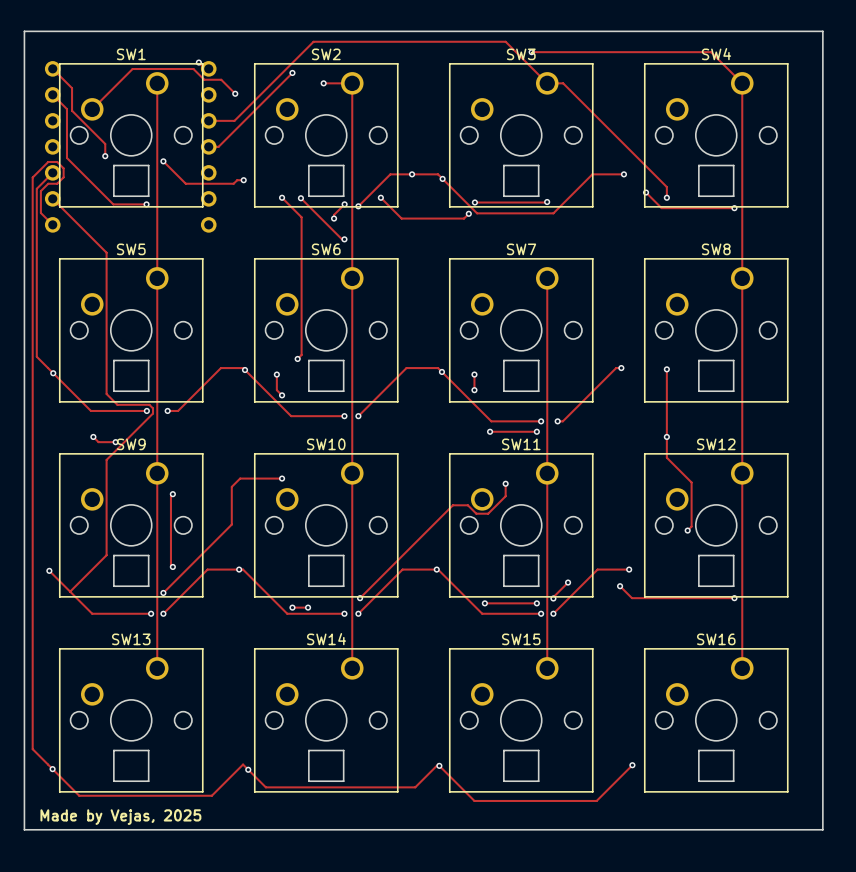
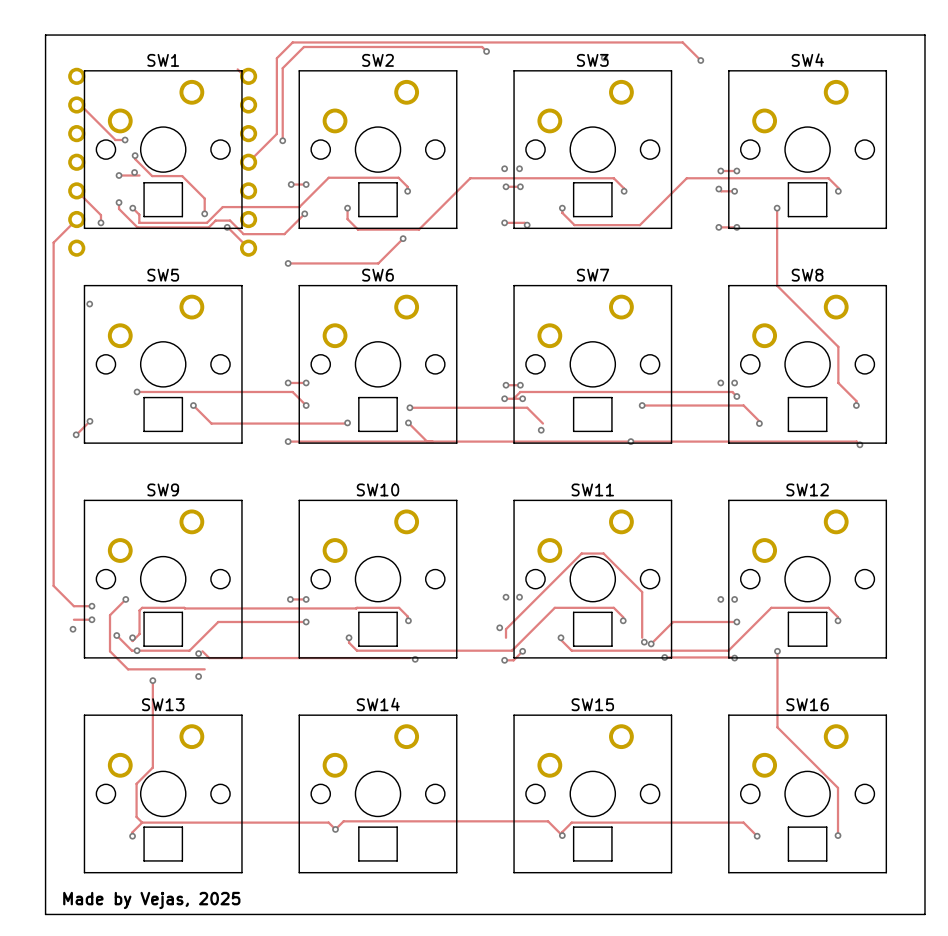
track: none -> (486, 51) (482, 46) (303, 46) (282, 68) (282, 140)
via: none -> (486, 51)
track: (531, 52) (711, 52) (742, 83) (742, 668) -> none
via: none -> (700, 60)
via: (198, 62) -> none
track: (52, 68) (72, 88) (72, 110) -> (76, 104) (80, 104) (98, 122)
track: (292, 72) (218, 146) (208, 146) -> (700, 60) (682, 42) (292, 42) (276, 58) (276, 133) (248, 162)
via: (292, 72) -> none
track: (157, 83) (157, 668) -> none
track: (323, 83) (352, 83) (352, 668) -> none
via: (323, 83) -> none
track: (235, 93) (221, 79) (204, 79) (193, 69) (132, 69) (92, 109) -> none
via: (235, 93) -> none
track: (52, 94) (66, 109) (66, 158) (113, 204) (146, 204) -> none
track: (208, 120) (234, 120) (313, 41) (505, 41) (547, 83) (563, 83) (666, 187) (666, 197) -> none
track: (87, 126) (105, 143) (105, 156) -> (115, 140) (125, 140)
via: none -> (125, 140)
via: none -> (282, 140)
track: none -> (135, 155) (135, 159) (152, 176) (182, 176) (204, 198) (204, 213)
via: none -> (135, 155)
via: none -> (504, 168)
via: none -> (519, 168)
track: none -> (720, 171) (736, 171)
via: none -> (720, 171)
via: none -> (736, 171)
track: none -> (119, 175) (139, 175)
via: none -> (119, 175)
track: (163, 161) (185, 183) (233, 183) (237, 180) (243, 180) -> none
via: (163, 161) -> none
track: none -> (291, 184) (306, 184)
via: none -> (291, 184)
via: none -> (306, 184)
track: none -> (506, 186) (520, 186)
via: none -> (506, 186)
via: none -> (520, 186)
track: none -> (718, 189) (721, 191) (734, 191)
via: none -> (718, 189)
track: (52, 172) (36, 188) (36, 356) (90, 410) (146, 410) -> (76, 190) (100, 215) (100, 222)
track: none -> (407, 191) (407, 186) (398, 177) (328, 177) (299, 207) (222, 207) (206, 222) (139, 222) (139, 214) (132, 208)
via: none -> (407, 191)
track: none -> (624, 191) (624, 188) (613, 178) (470, 178) (418, 229) (358, 229) (347, 219) (347, 208)
via: none -> (624, 191)
via: none -> (734, 191)
track: none -> (838, 191) (838, 188) (828, 178) (686, 178) (639, 225) (574, 225) (562, 212) (562, 208)
via: none -> (838, 191)
via: (412, 174) -> none
track: (623, 174) (592, 174) (553, 213) (477, 213) (438, 174) (390, 174) (358, 206) -> none
via: (623, 174) -> none
via: (442, 178) -> none
via: (243, 180) -> none
track: none -> (119, 202) (119, 208) (137, 227) (208, 227) (215, 220) (230, 220) (243, 234) (284, 234) (304, 213)
via: none -> (119, 202)
via: none -> (132, 208)
via: none -> (347, 208)
via: none -> (562, 208)
track: none -> (777, 208) (777, 285) (838, 346) (838, 382) (856, 401) (856, 405)
via: none -> (777, 208)
track: (646, 192) (661, 208) (734, 208) -> none
via: (646, 192) -> none
via: none -> (204, 213)
via: none -> (304, 213)
track: (282, 197) (301, 217) (301, 355) (297, 358) -> none
via: (282, 197) -> none
track: (380, 197) (401, 218) (464, 218) (468, 213) -> none
via: (380, 197) -> none
via: (666, 197) -> none
track: (52, 198) (106, 252) (106, 394) (117, 404) (149, 404) (153, 408) (153, 413) (106, 459) (106, 555) (70, 591) -> (76, 219) (53, 242) (53, 585) (73, 606) (91, 606)
track: (300, 198) (342, 239) (344, 239) -> none
via: (300, 198) -> none
via: none -> (100, 222)
track: none -> (504, 222) (524, 222) (527, 225)
via: none -> (504, 222)
via: (474, 202) -> none
track: (547, 202) (474, 202) -> none
via: (547, 202) -> none
via: none -> (527, 225)
via: (146, 204) -> none
track: (344, 204) (334, 214) (334, 218) -> none
via: (344, 204) -> none
track: none -> (227, 227) (248, 248)
via: none -> (227, 227)
track: none -> (718, 227) (736, 227)
via: none -> (718, 227)
via: none -> (736, 227)
via: (358, 206) -> none
via: (734, 208) -> none
via: (468, 213) -> none
track: none -> (403, 238) (378, 263) (288, 263)
via: none -> (403, 238)
via: (334, 218) -> none
track: (52, 224) (40, 213) (40, 191) (48, 183) (57, 183) (63, 177) (63, 168) (57, 161) (48, 161) (32, 177) (32, 749) (79, 795) (211, 795) (243, 764) (265, 787) (415, 787) (438, 764) (474, 800) (596, 800) (632, 765) -> none
via: none -> (288, 263)
via: (344, 239) -> none
via: none -> (89, 304)
track: (547, 278) (547, 668) -> none
track: none -> (288, 382) (306, 382)
via: none -> (288, 382)
via: none -> (306, 382)
via: none -> (720, 382)
via: none -> (734, 382)
track: none -> (506, 385) (520, 385)
via: none -> (506, 385)
via: none -> (520, 385)
track: none -> (137, 391) (292, 391) (306, 405)
via: none -> (137, 391)
via: (297, 358) -> none
track: none -> (736, 396) (732, 391) (520, 391) (513, 398)
via: none -> (736, 396)
track: none -> (504, 398) (522, 398)
via: none -> (504, 398)
via: none -> (522, 398)
track: none -> (193, 405) (211, 423) (347, 422)
via: none -> (193, 405)
via: none -> (306, 405)
track: none -> (642, 405) (743, 405) (759, 423)
via: none -> (642, 405)
via: none -> (856, 405)
track: (621, 368) (616, 368) (562, 421) (557, 421) -> none
via: (621, 368) -> none
track: none -> (409, 407) (527, 407) (542, 423)
via: none -> (409, 407)
track: (666, 369) (666, 457) (691, 482) (691, 526) (687, 530) -> none
via: (666, 369) -> none
via: (245, 370) -> none
via: (441, 371) -> none
via: (53, 373) -> none
track: (276, 374) (276, 390) (282, 395) -> none
via: (276, 374) -> none
track: (474, 374) (474, 390) -> none
via: (474, 374) -> none
track: none -> (89, 421) (76, 434)
via: none -> (89, 421)
via: none -> (347, 422)
track: none -> (408, 422) (427, 441)
via: none -> (408, 422)
via: none -> (759, 423)
via: none -> (76, 434)
via: (282, 395) -> none
track: none -> (288, 441) (856, 441) (859, 444)
via: none -> (288, 441)
via: none -> (630, 441)
via: none -> (859, 444)
via: (146, 410) -> none
track: (167, 410) (178, 410) (220, 368) (243, 368) (291, 416) (344, 416) -> none
via: (167, 410) -> none
via: (344, 416) -> none
track: (358, 416) (406, 368) (438, 368) (491, 421) (541, 421) -> none
via: (358, 416) -> none
via: (541, 421) -> none
via: (557, 421) -> none
track: (490, 431) (536, 431) -> none
via: (490, 431) -> none
via: (536, 431) -> none
track: (93, 436) (98, 442) (115, 442) -> none
via: (93, 436) -> none
via: (666, 436) -> none
via: (115, 442) -> none
track: (282, 478) (240, 478) (231, 486) (231, 524) (163, 592) -> none
via: (282, 478) -> none
track: (505, 483) (505, 496) (488, 513) (476, 513) (467, 505) (452, 505) (360, 598) -> none
via: (505, 483) -> none
track: (172, 494) (170, 496) (170, 565) (172, 566) -> none
via: (172, 494) -> none
via: (687, 530) -> none
via: none -> (506, 597)
via: none -> (519, 597)
track: none -> (125, 599) (110, 615) (110, 651) (128, 669) (204, 669)
via: none -> (125, 599)
track: none -> (290, 599) (306, 599)
via: none -> (290, 599)
via: none -> (306, 599)
via: none -> (720, 599)
via: none -> (734, 599)
via: none -> (91, 606)
track: none -> (73, 619) (91, 619)
via: none -> (91, 619)
track: none -> (408, 620) (407, 616) (399, 607) (142, 607) (139, 610) (139, 634) (132, 641) (132, 637)
via: none -> (408, 620)
track: none -> (623, 620) (623, 617) (613, 607) (554, 607) (511, 650) (356, 650) (349, 642) (349, 637)
via: none -> (623, 620)
track: none -> (838, 620) (838, 617) (828, 607) (771, 607) (728, 650) (571, 650) (560, 637)
via: none -> (838, 620)
track: none -> (306, 621) (218, 621) (189, 650) (131, 650) (116, 635)
via: none -> (306, 621)
track: none -> (736, 621) (673, 621) (651, 643)
via: none -> (736, 621)
via: (172, 566) -> none
via: (239, 569) -> none
track: (629, 569) (597, 569) (553, 613) -> none
via: (629, 569) -> none
track: (49, 570) (92, 613) (151, 613) -> none
via: none -> (116, 635)
via: none -> (132, 637)
via: none -> (349, 637)
track: none -> (506, 637) (506, 629) (581, 553) (603, 553) (642, 592) (642, 637)
via: none -> (560, 637)
track: (568, 582) (553, 598) -> none
via: none -> (651, 643)
track: (620, 586) (632, 598) (734, 598) -> none
via: (620, 586) -> none
via: none -> (137, 650)
track: none -> (202, 651) (209, 658) (409, 658)
track: none -> (522, 651) (513, 660) (504, 660)
via: none -> (522, 651)
track: none -> (777, 651) (777, 727) (838, 787) (838, 835)
via: none -> (777, 651)
track: none -> (664, 657) (734, 658)
via: none -> (664, 657)
via: none -> (734, 658)
via: (553, 598) -> none
via: (734, 598) -> none
via: none -> (504, 660)
track: (484, 603) (536, 603) -> none
via: (484, 603) -> none
via: (536, 603) -> none
track: (292, 607) (308, 607) -> none
via: (292, 607) -> none
via: (308, 607) -> none
via: (151, 613) -> none
track: (163, 613) (207, 569) (243, 569) (287, 613) (344, 613) -> none
via: (344, 613) -> none
track: (358, 613) (402, 569) (438, 569) (482, 613) (541, 613) -> none
via: (358, 613) -> none
via: (541, 613) -> none
via: (553, 613) -> none
track: none -> (152, 680) (152, 767) (136, 783) (136, 817) (142, 822)
via: none -> (152, 680)
track: none -> (142, 822) (132, 832) (132, 836)
track: none -> (142, 822) (328, 822) (335, 829) (343, 821) (548, 821) (562, 835) (562, 832) (571, 822) (743, 822) (757, 836)
via: none -> (838, 835)
via position: (439, 765) -> (562, 835)
via position: (632, 765) -> (757, 836)
via position: (52, 769) -> (132, 836)
via position: (248, 769) -> (335, 829)

